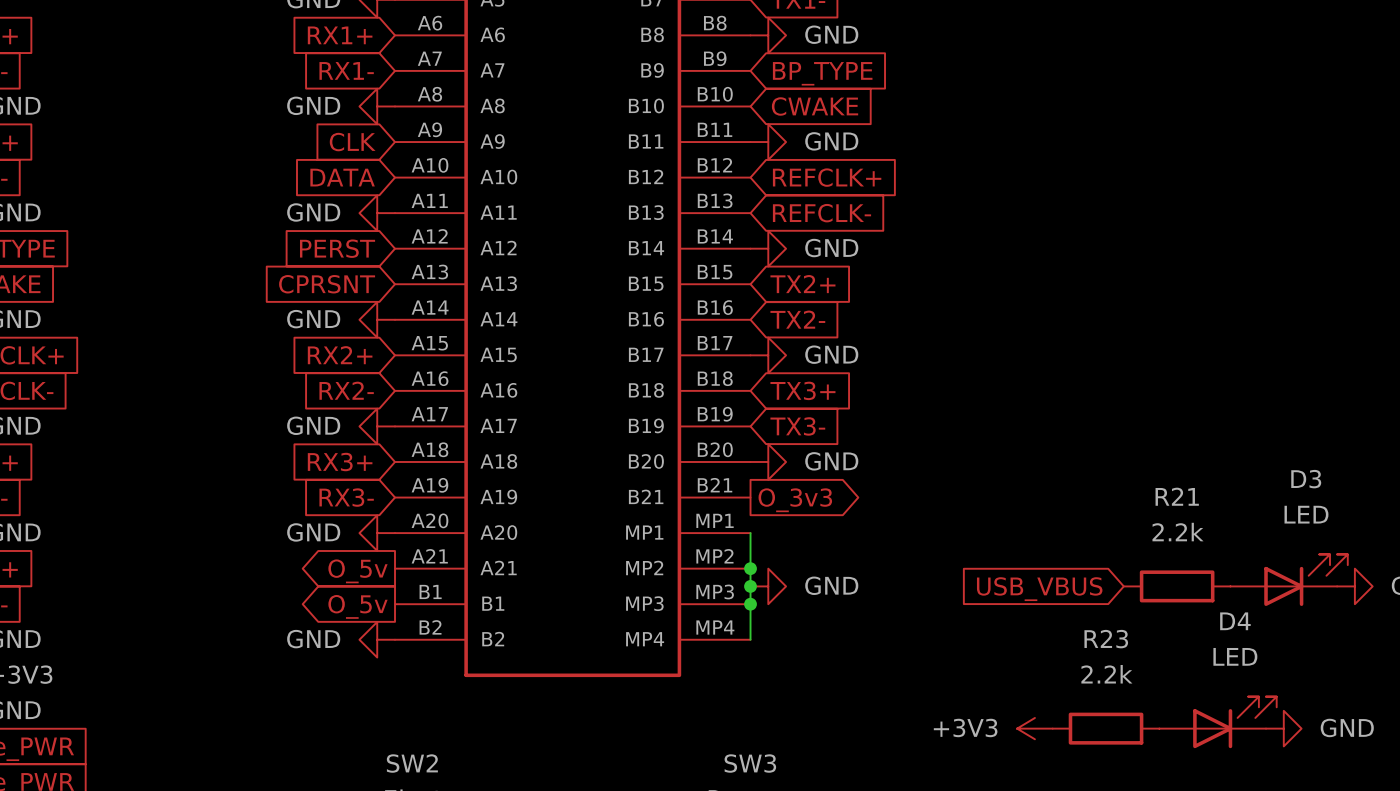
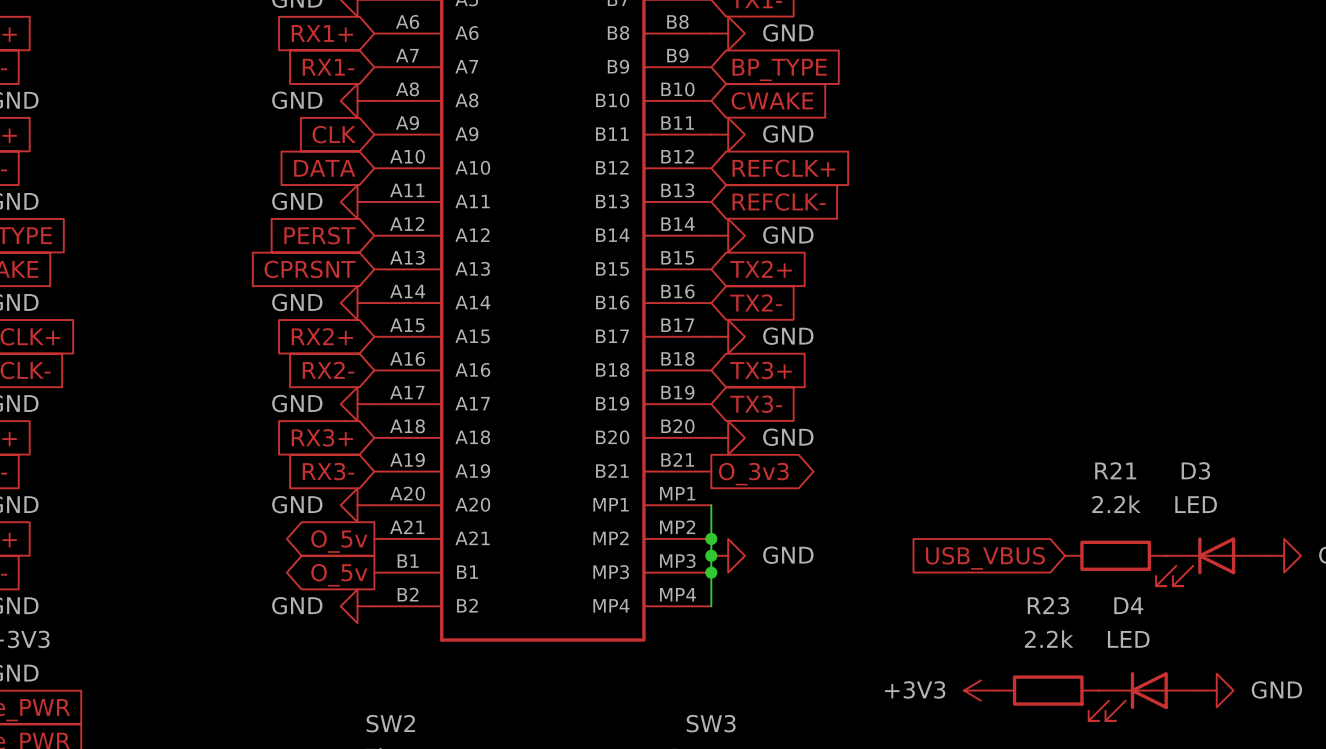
D3 name position: D3 (1306, 479) -> D3 (1195, 470)
D3 value position: LED (1306, 514) -> LED (1196, 504)
D3 rotation: 0° (1306, 580) -> 180° (1195, 561)
D4 name position: D4 (1235, 621) -> D4 (1128, 605)
D4 value position: LED (1235, 656) -> LED (1128, 639)
D4 rotation: 0° (1234, 722) -> 180° (1128, 696)

